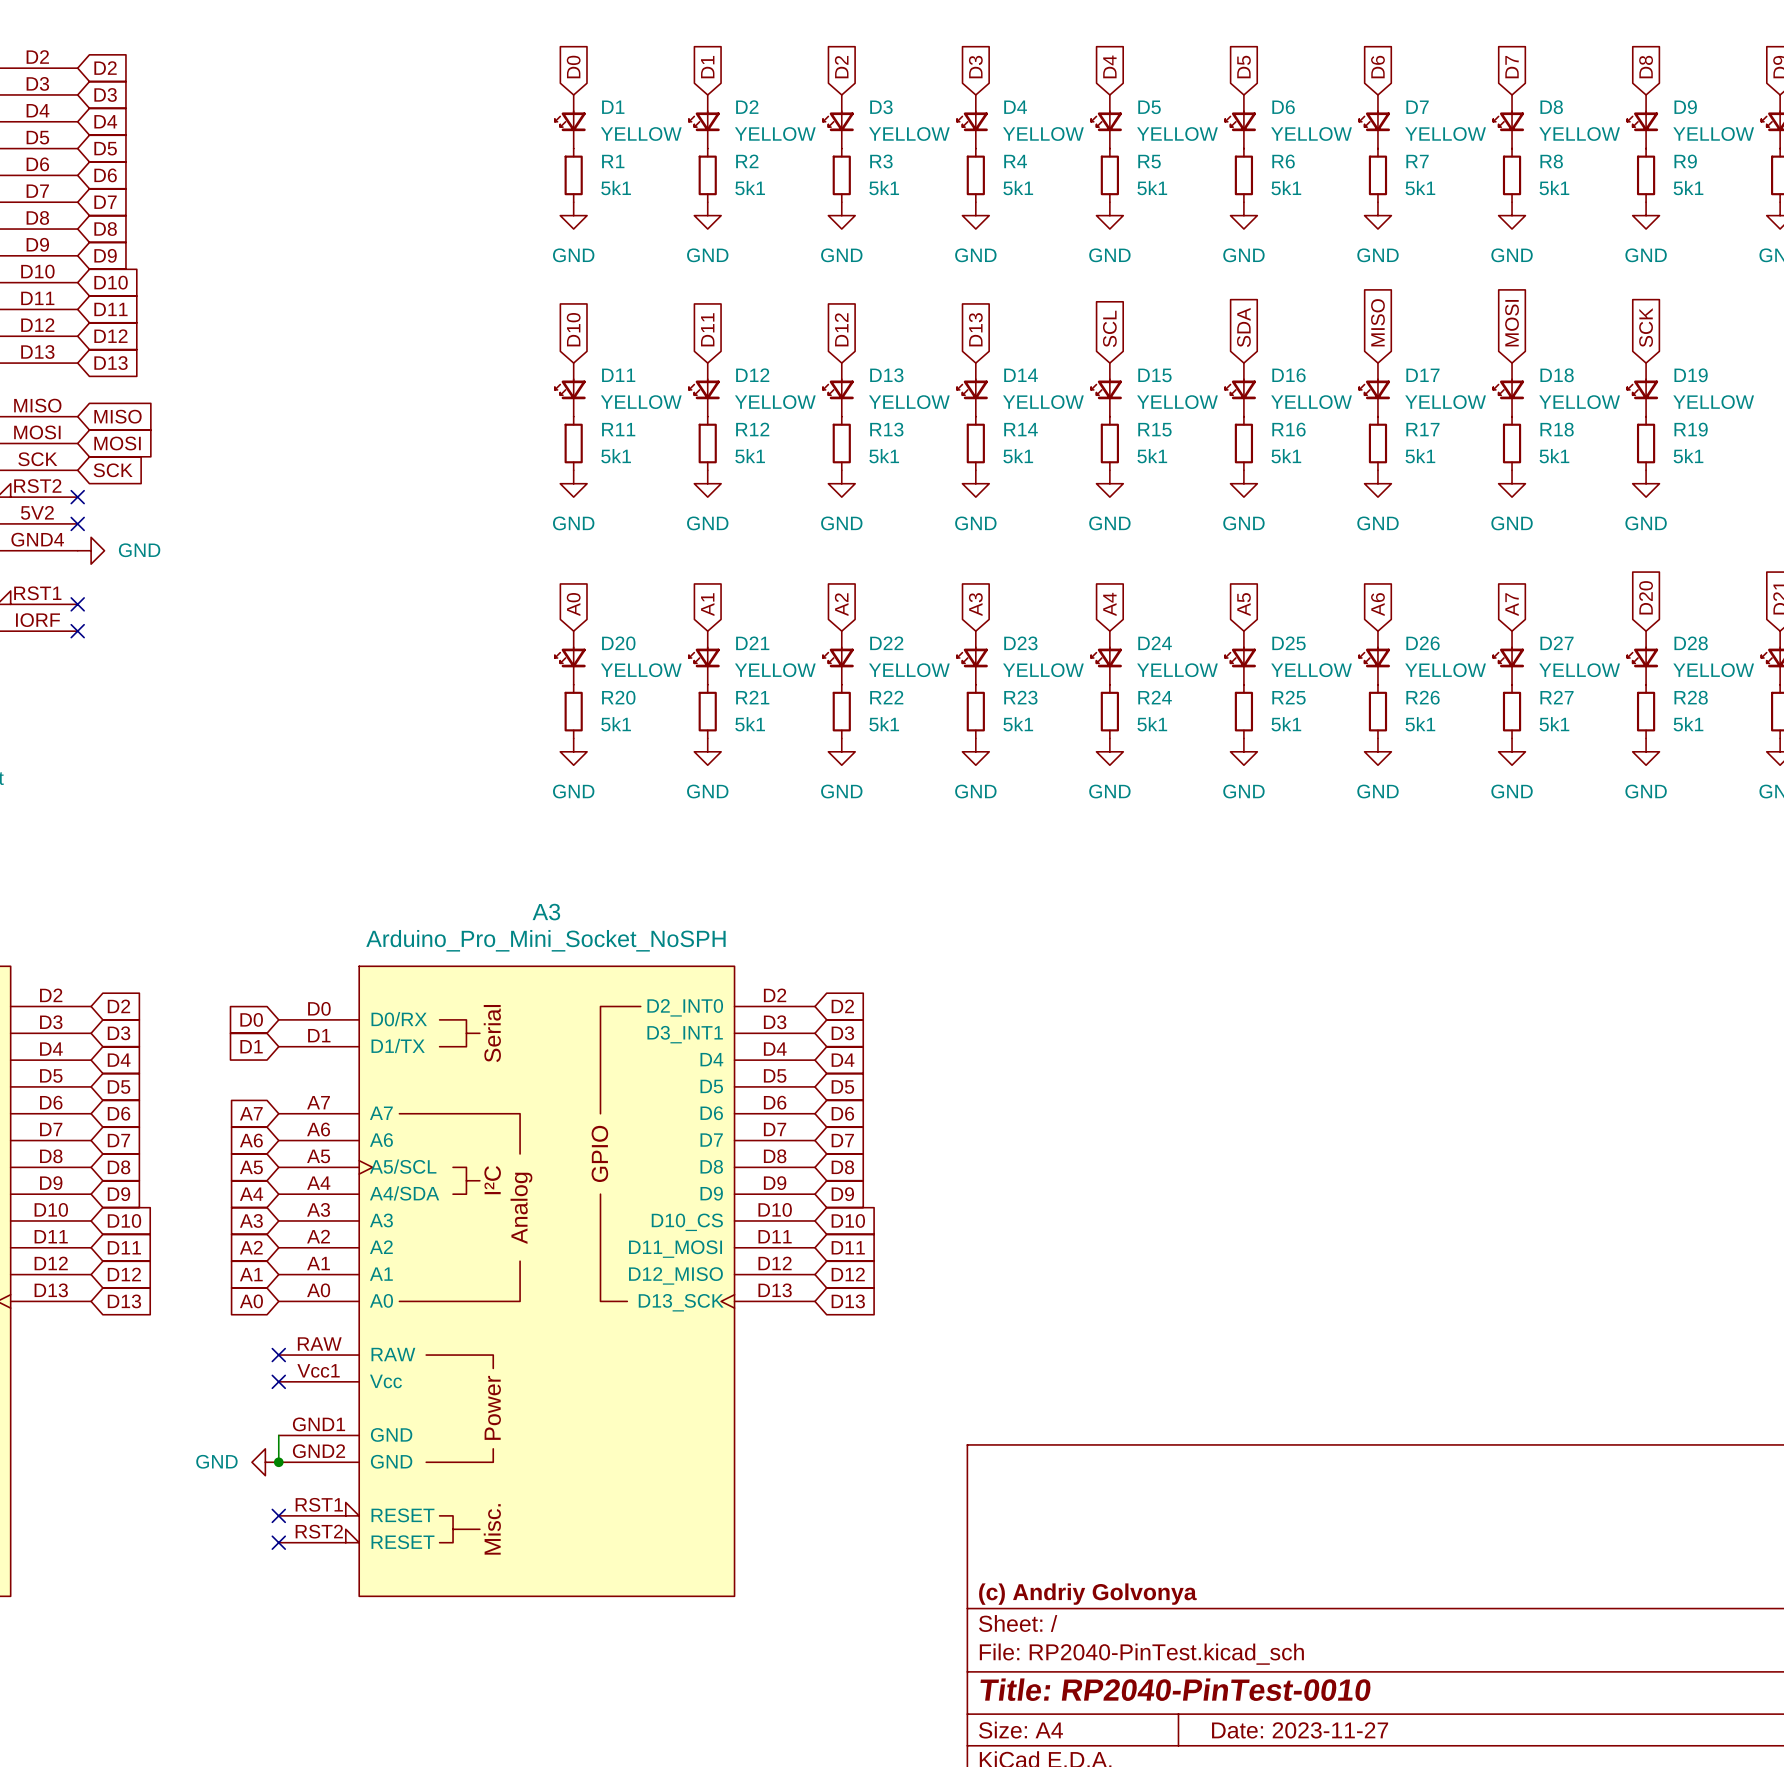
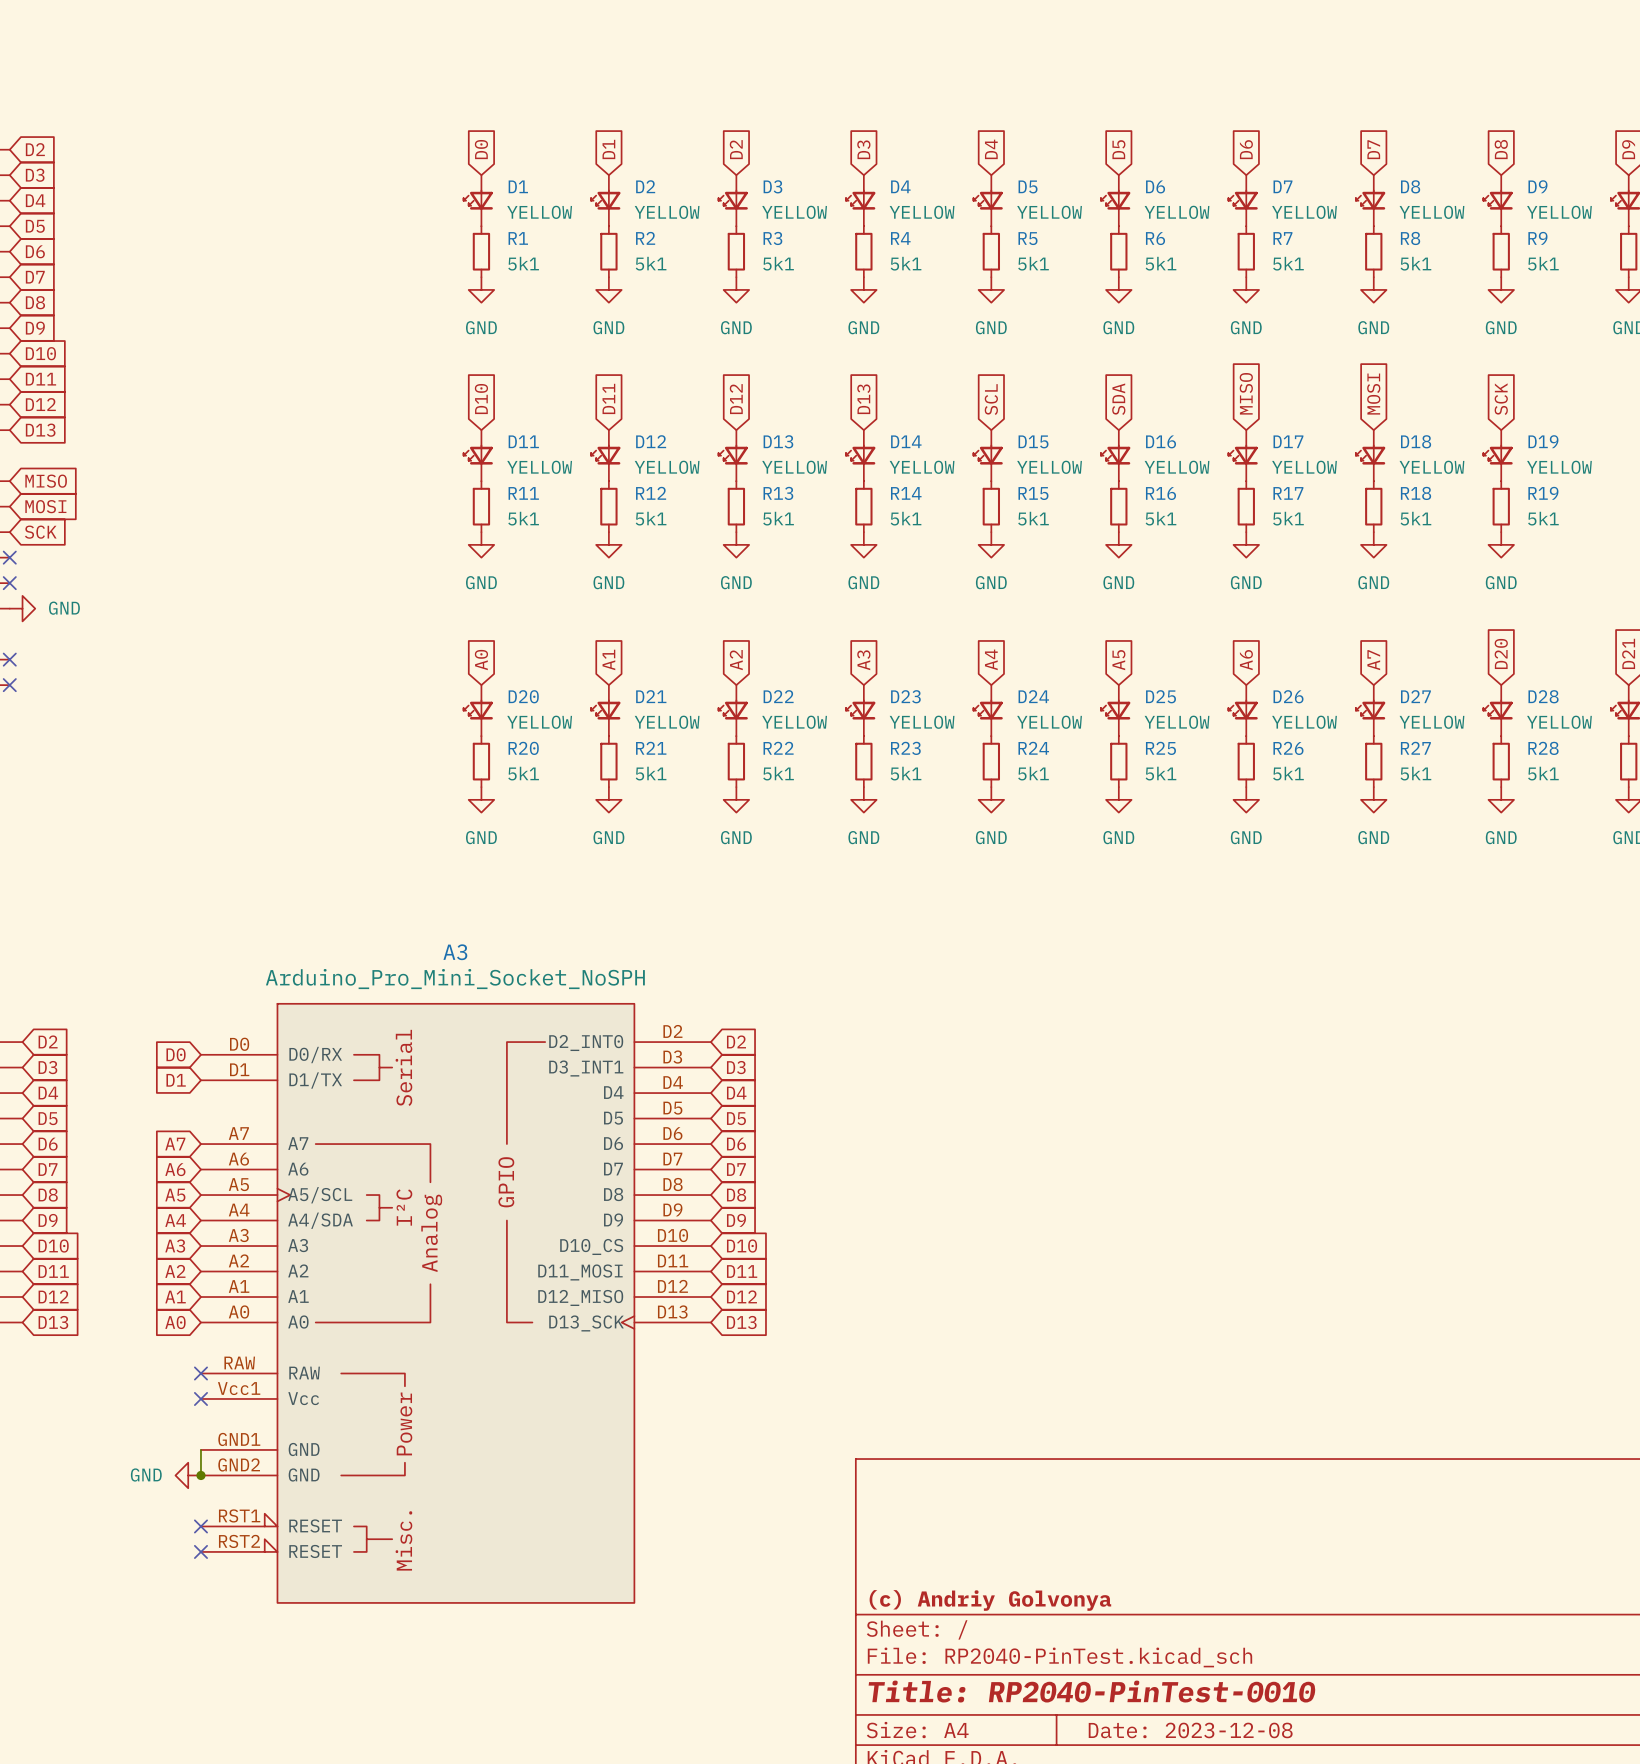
title block: Date: 2023-11-27 (1300, 1730) -> Date: 2023-12-08 (1190, 1730)

